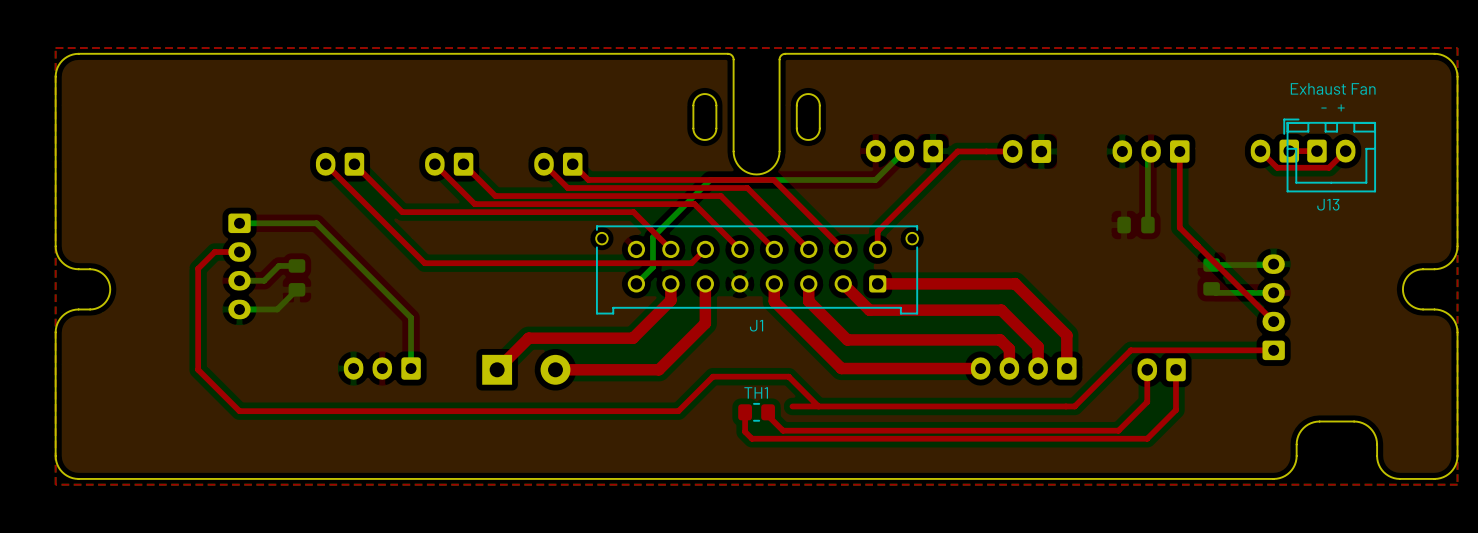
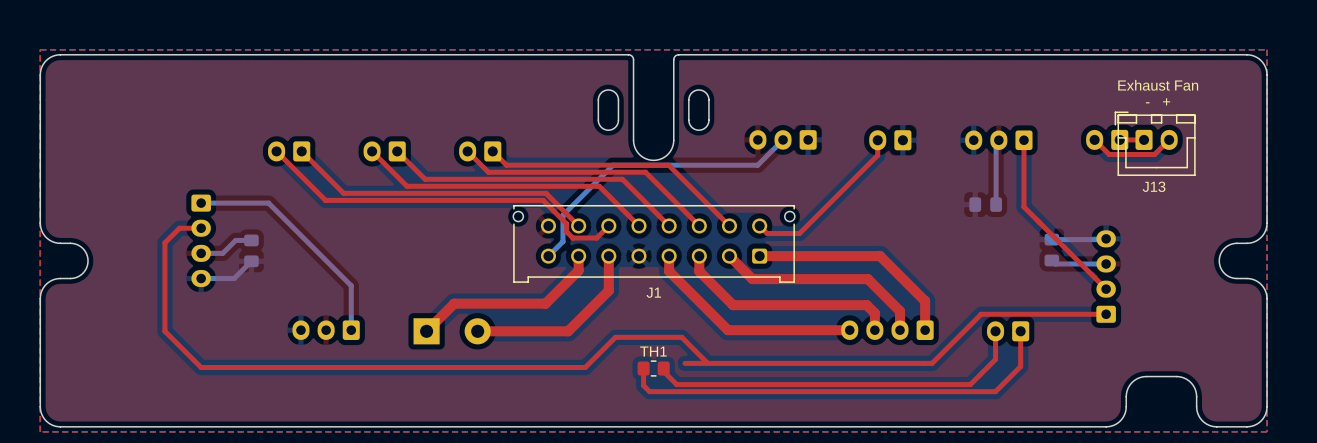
top track: (1012, 151) (957, 151) (877, 231) (877, 249) -> (877, 140) (877, 155) (799, 233) (767, 233) (759, 225)
top track: (381, 220) (424, 263) (664, 263) -> (325, 200) (543, 200) (566, 223) (566, 231) (572, 238)

